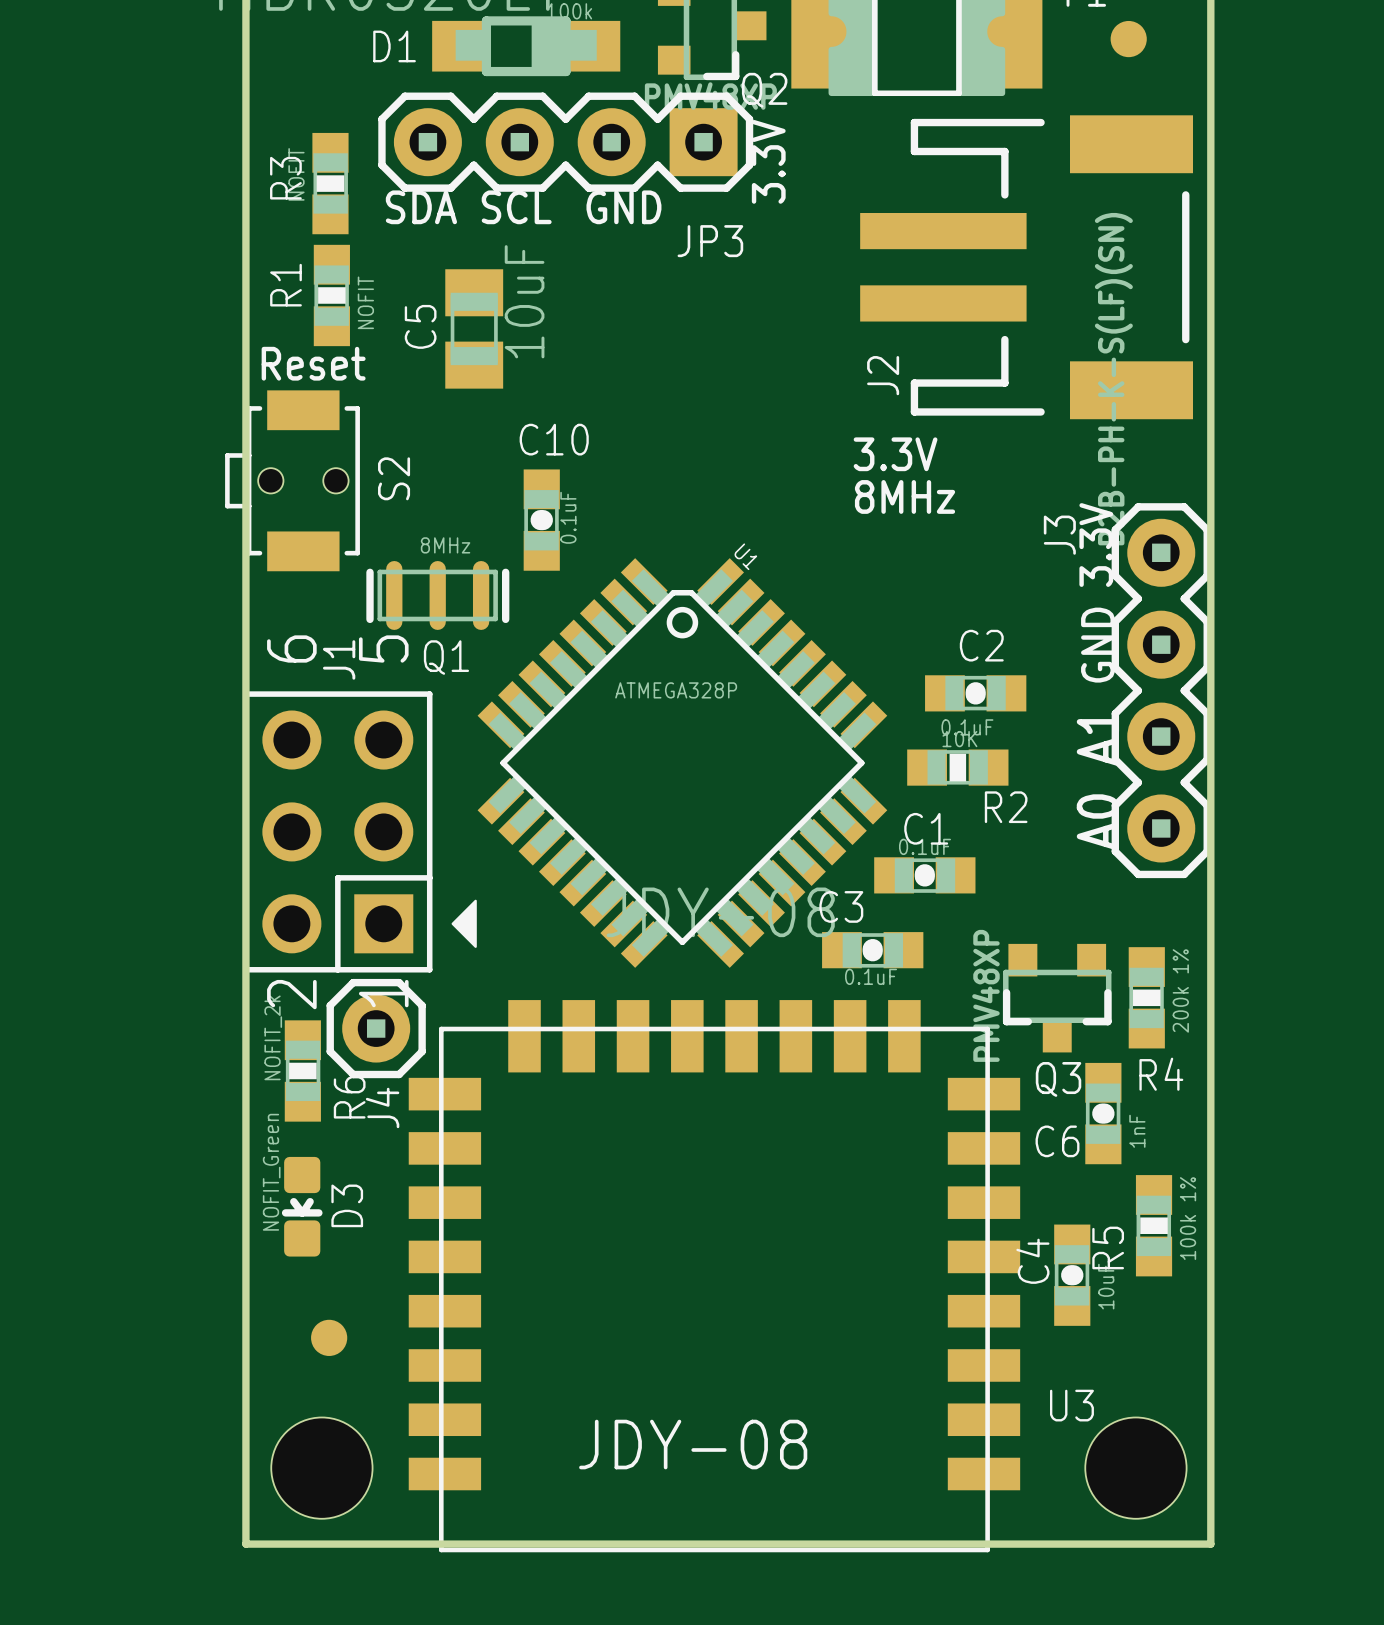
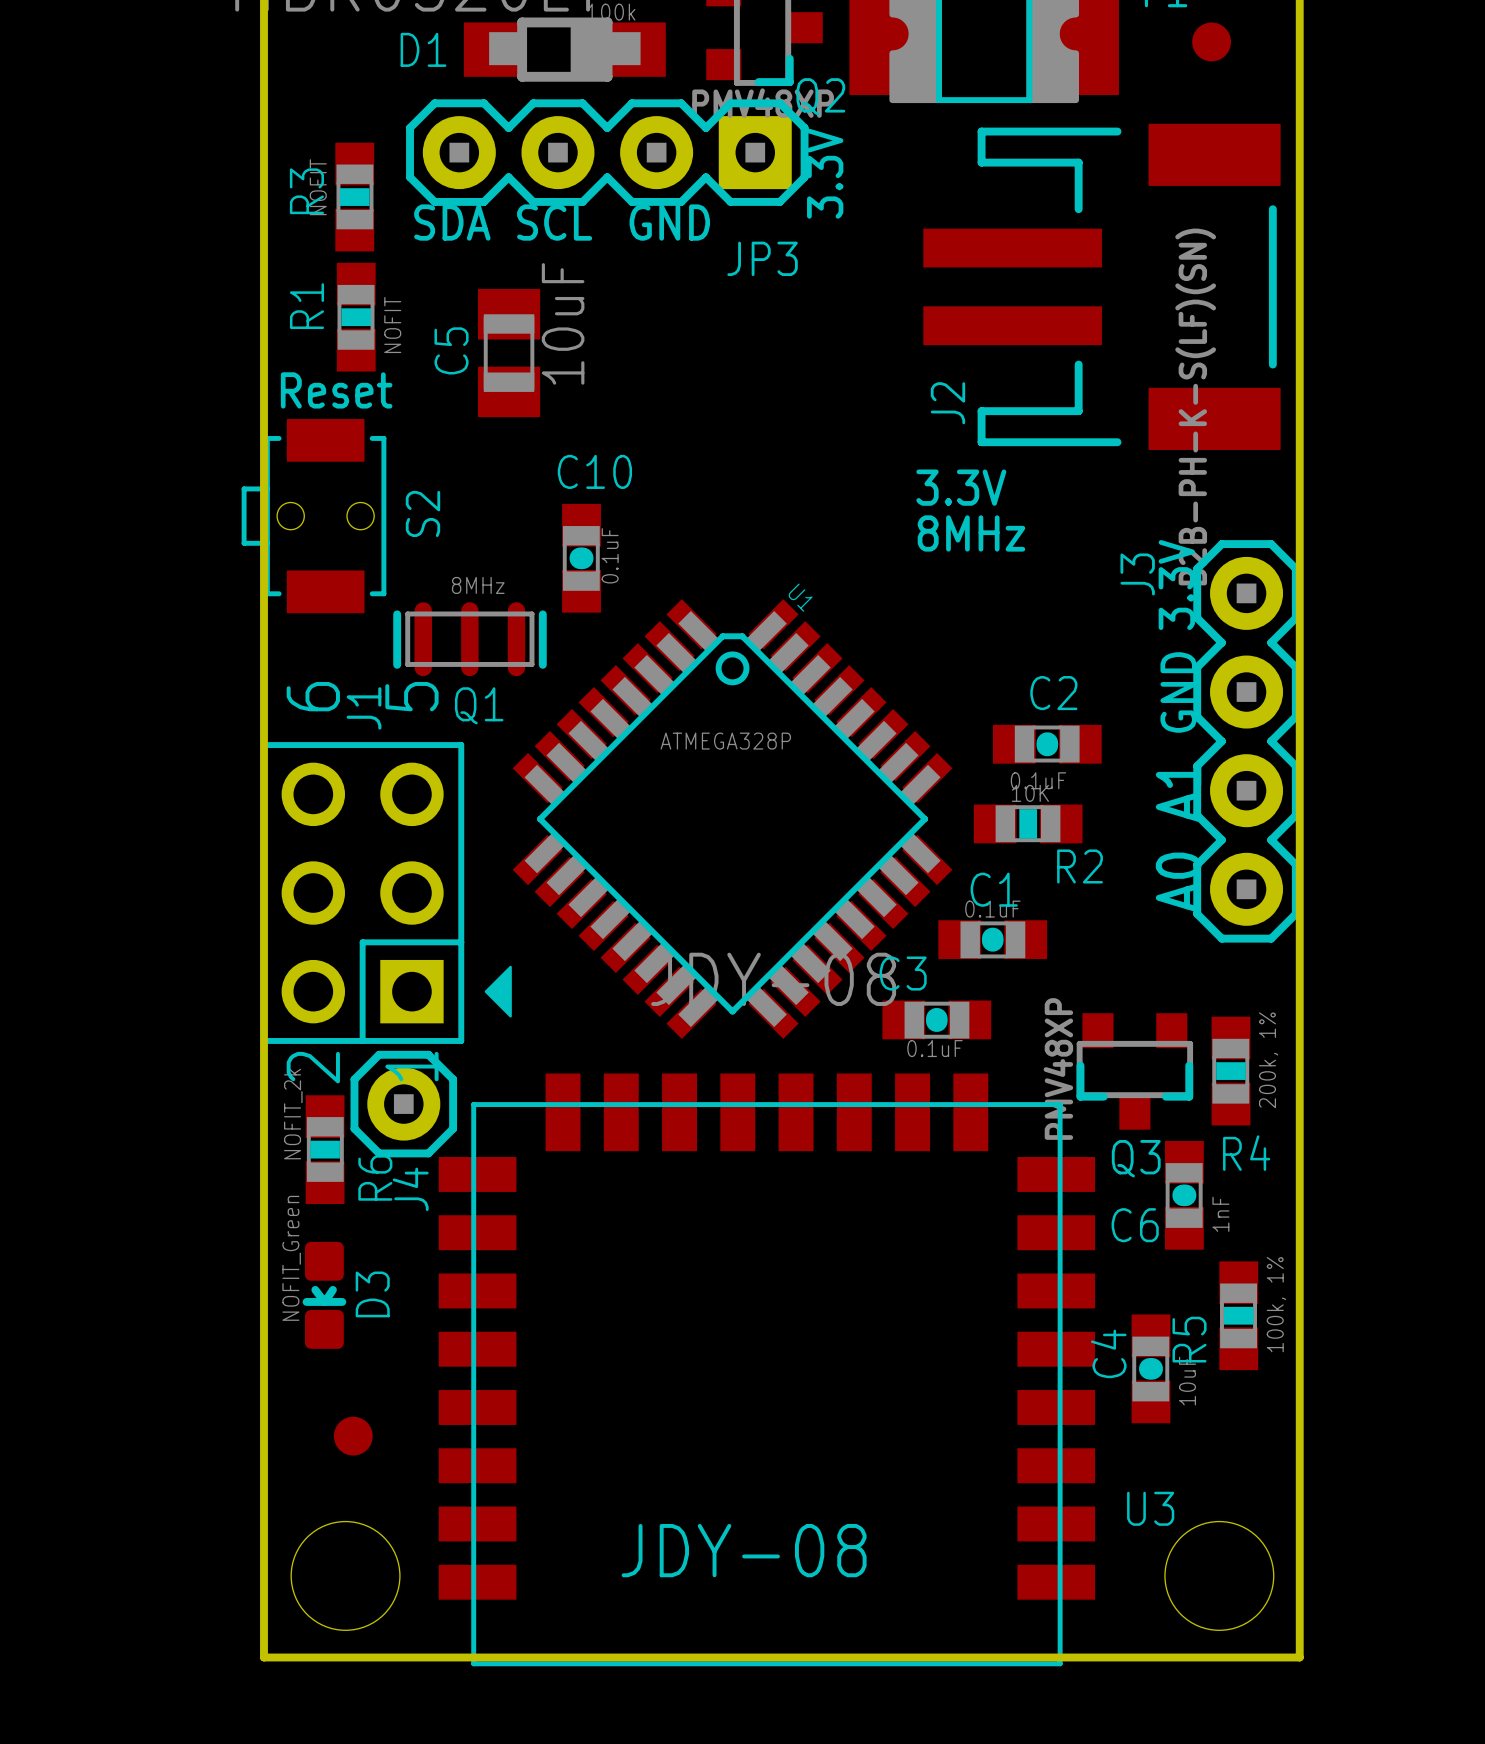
R4 value: 200k 1% (1180, 990) -> 200k, 1% (1268, 1060)
R5 value: 100k 1% (1188, 1218) -> 100k, 1% (1276, 1304)

